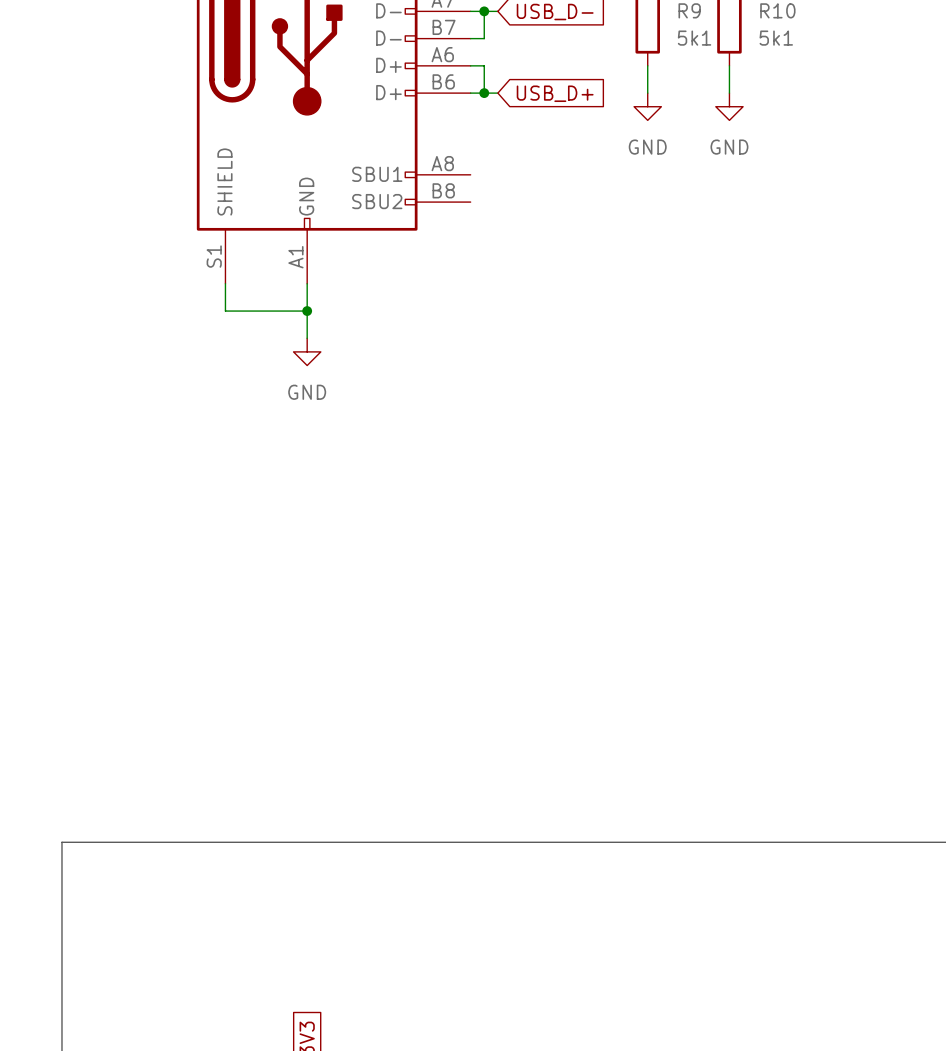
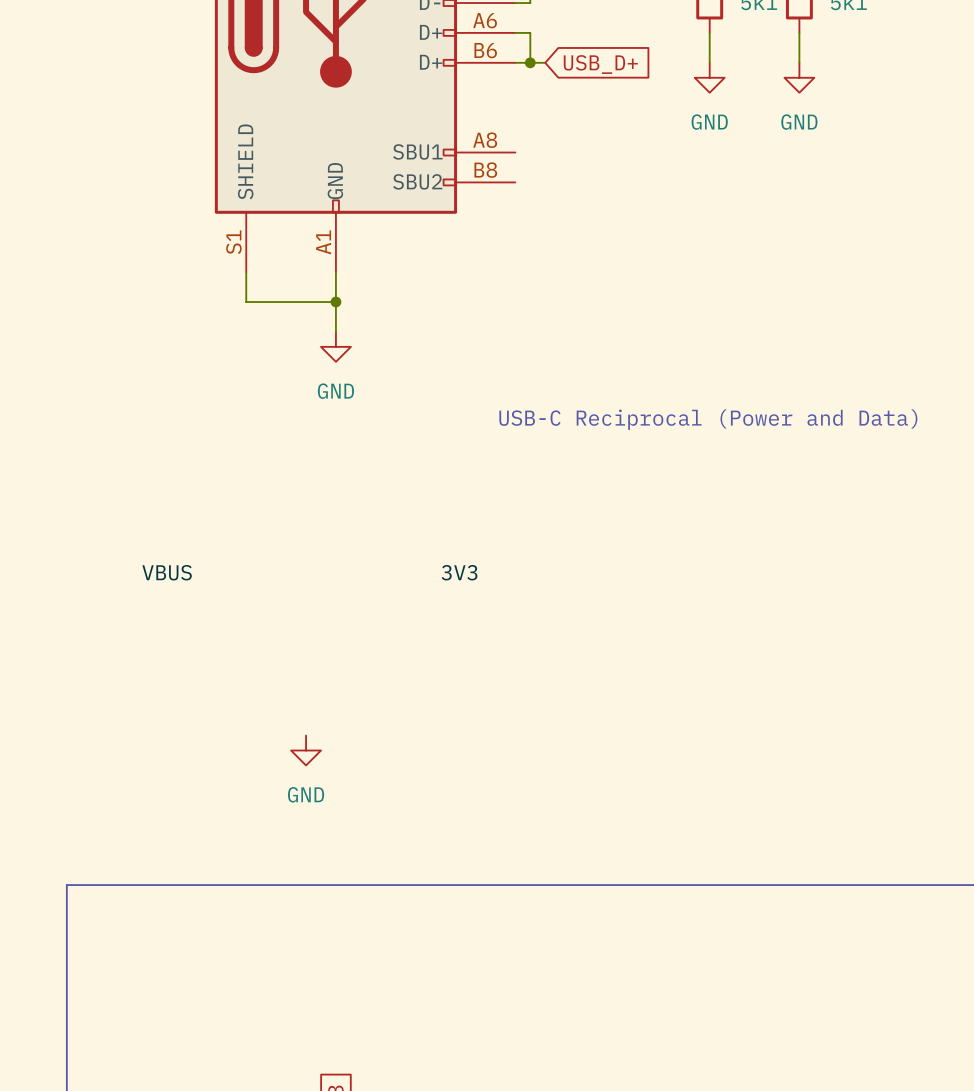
text: none -> USB-C Reciprocal (Power and Data) (708, 419)
label: none -> VBUS (167, 572)
label: none -> 3V3 (459, 572)
power symbol: none -> GND (306, 750)

